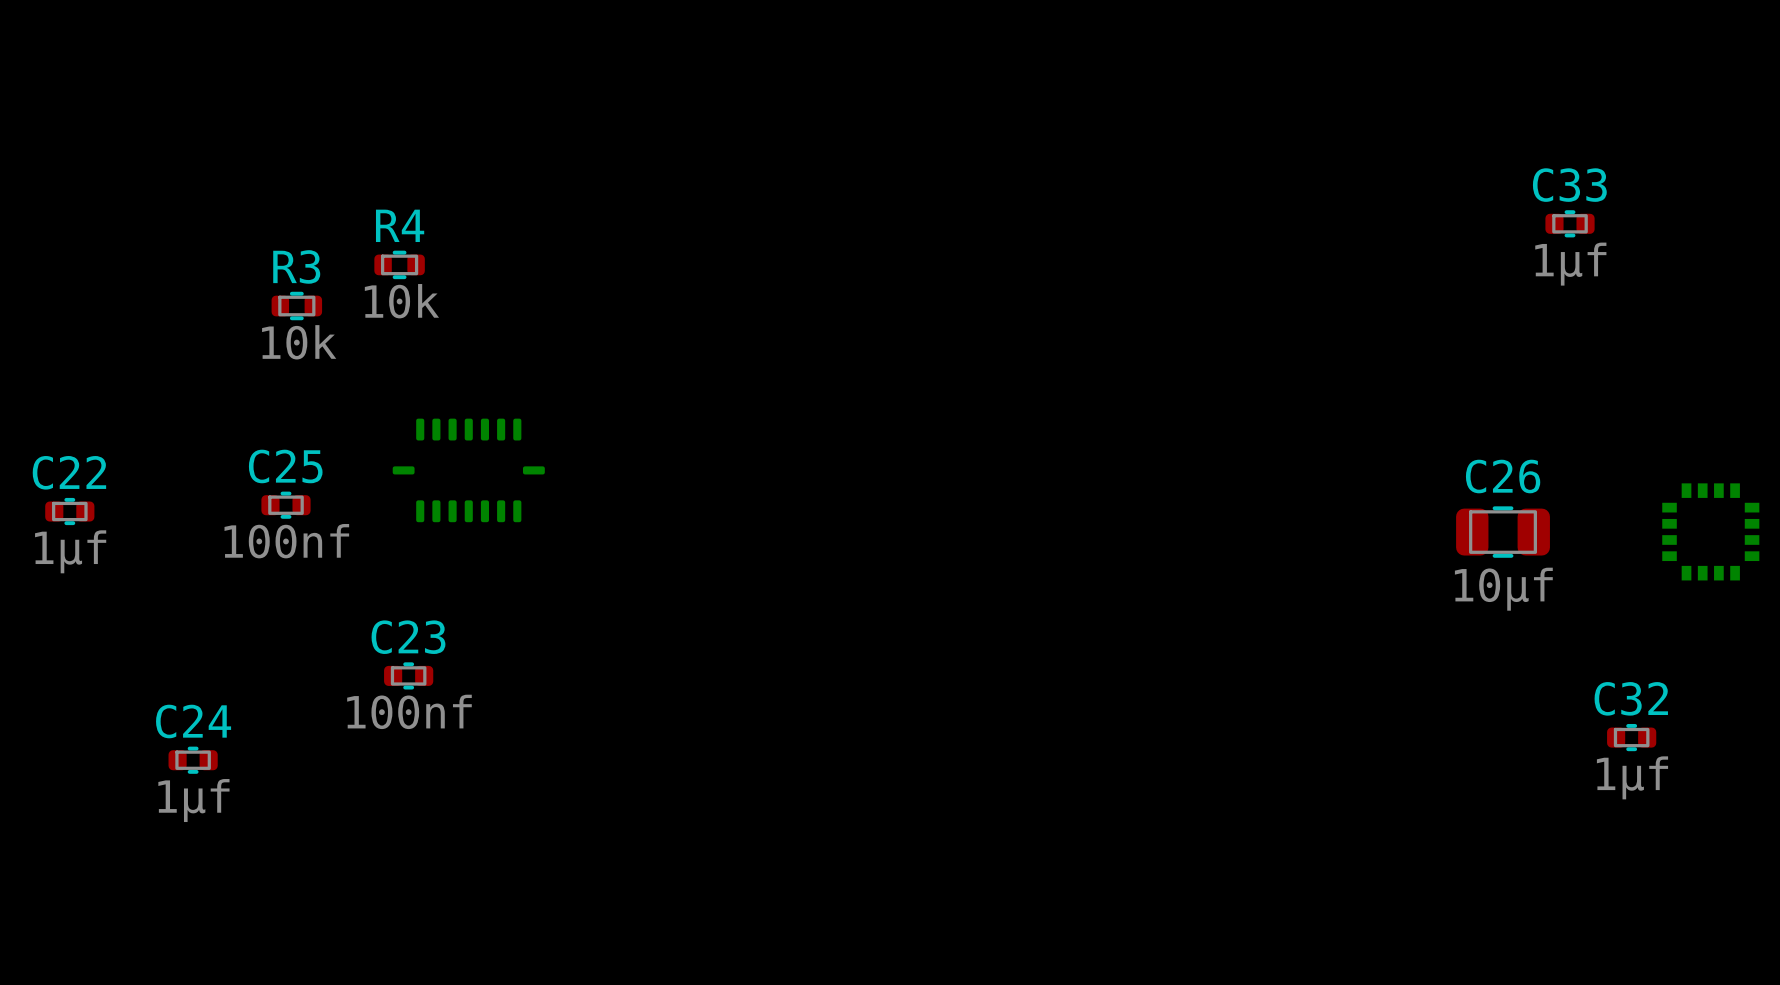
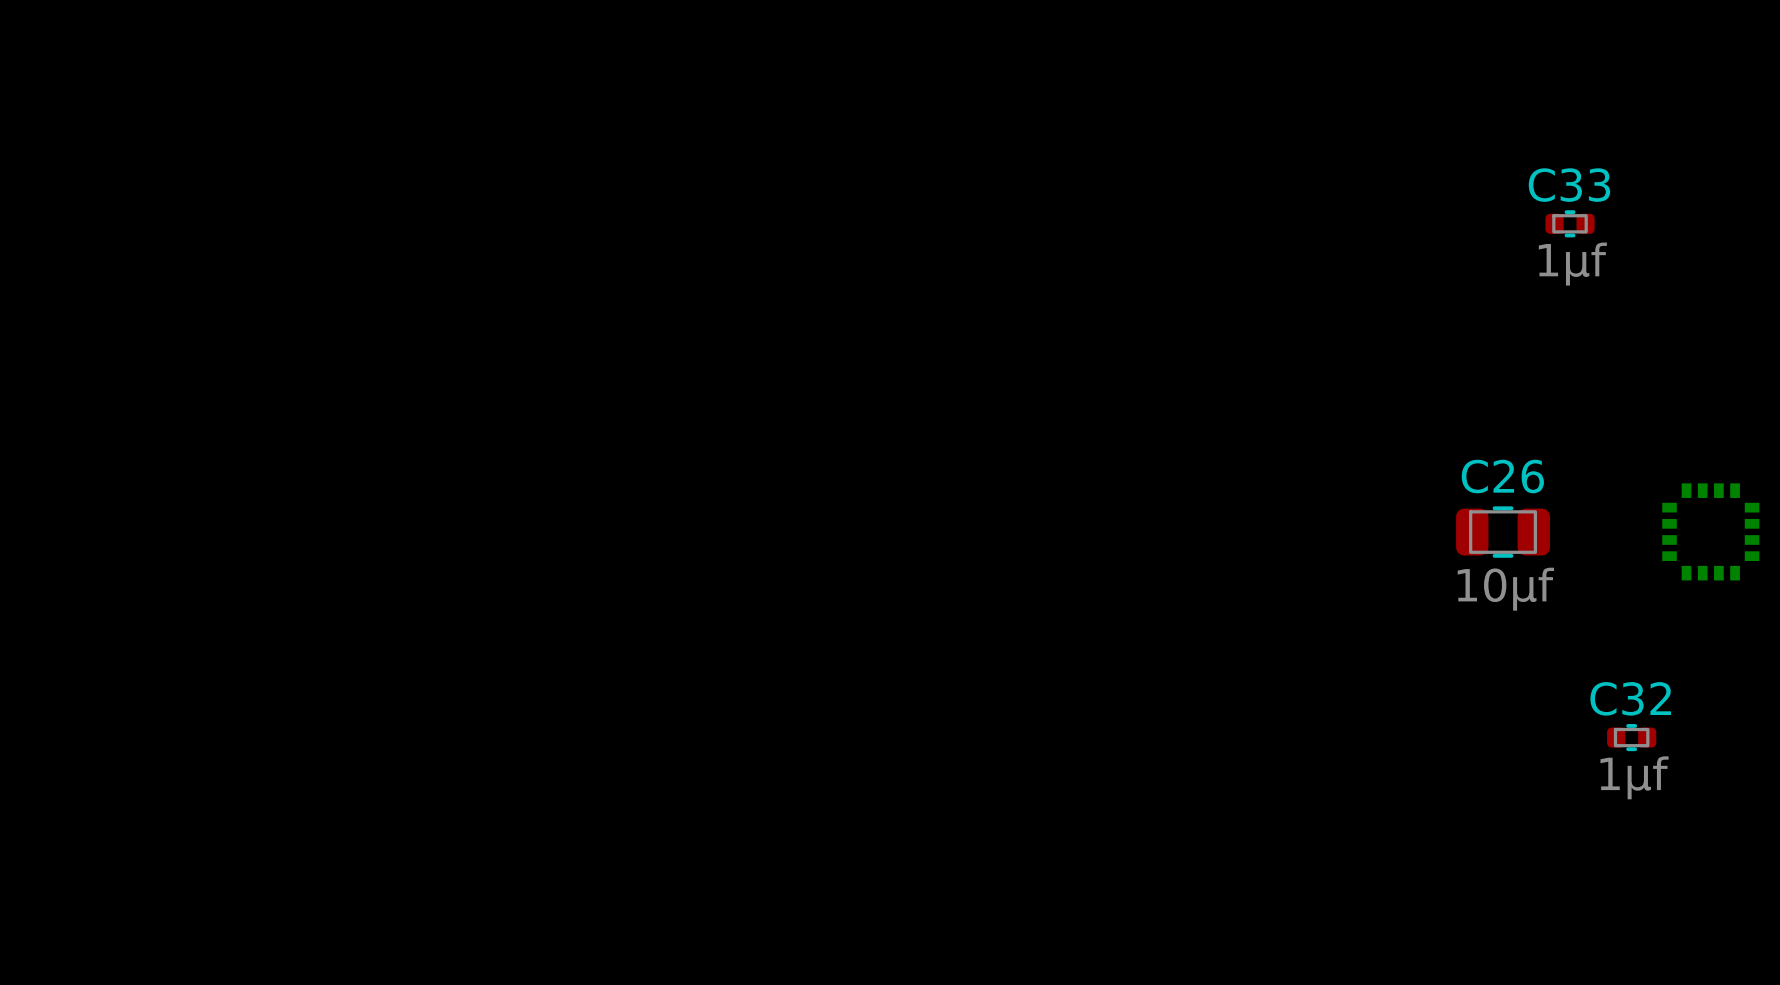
R4: 10k (399, 264) -> none
R3: 10k (296, 306) -> none
part: (468, 470) -> none
C25: 100nf (286, 505) -> none
C22: 1μf (69, 511) -> none
C23: 100nf (408, 675) -> none
C24: 1μf (193, 760) -> none

